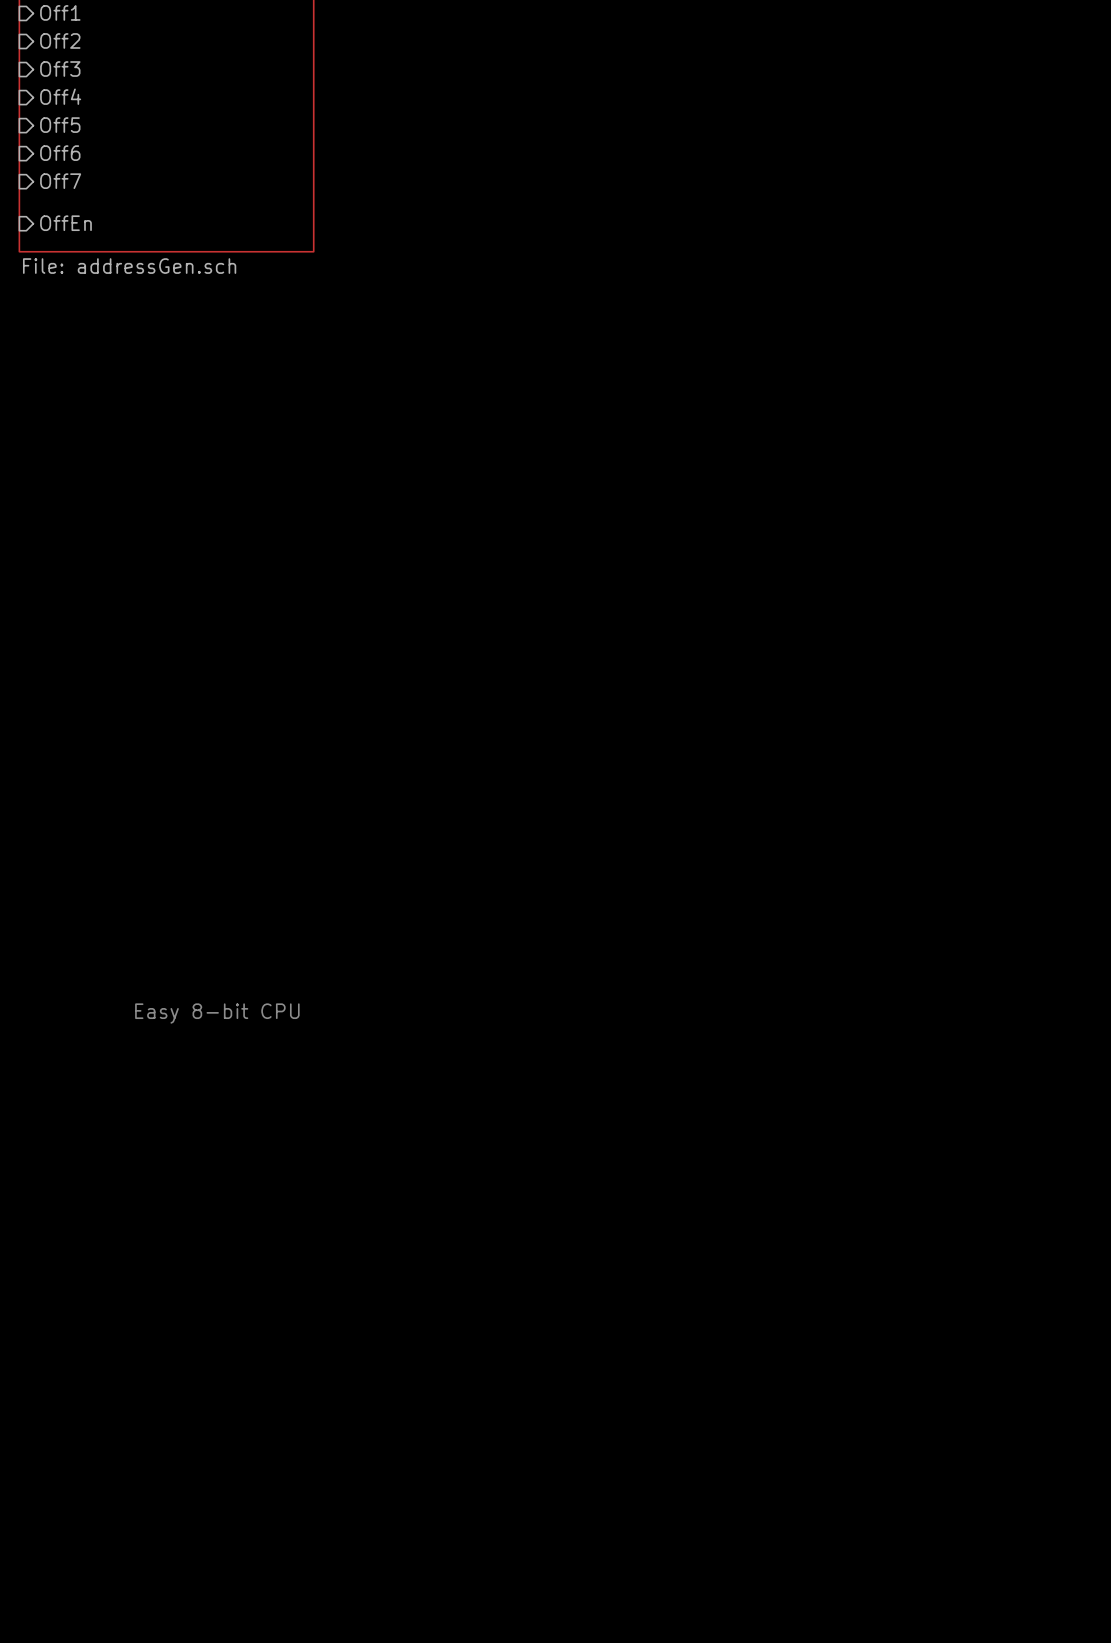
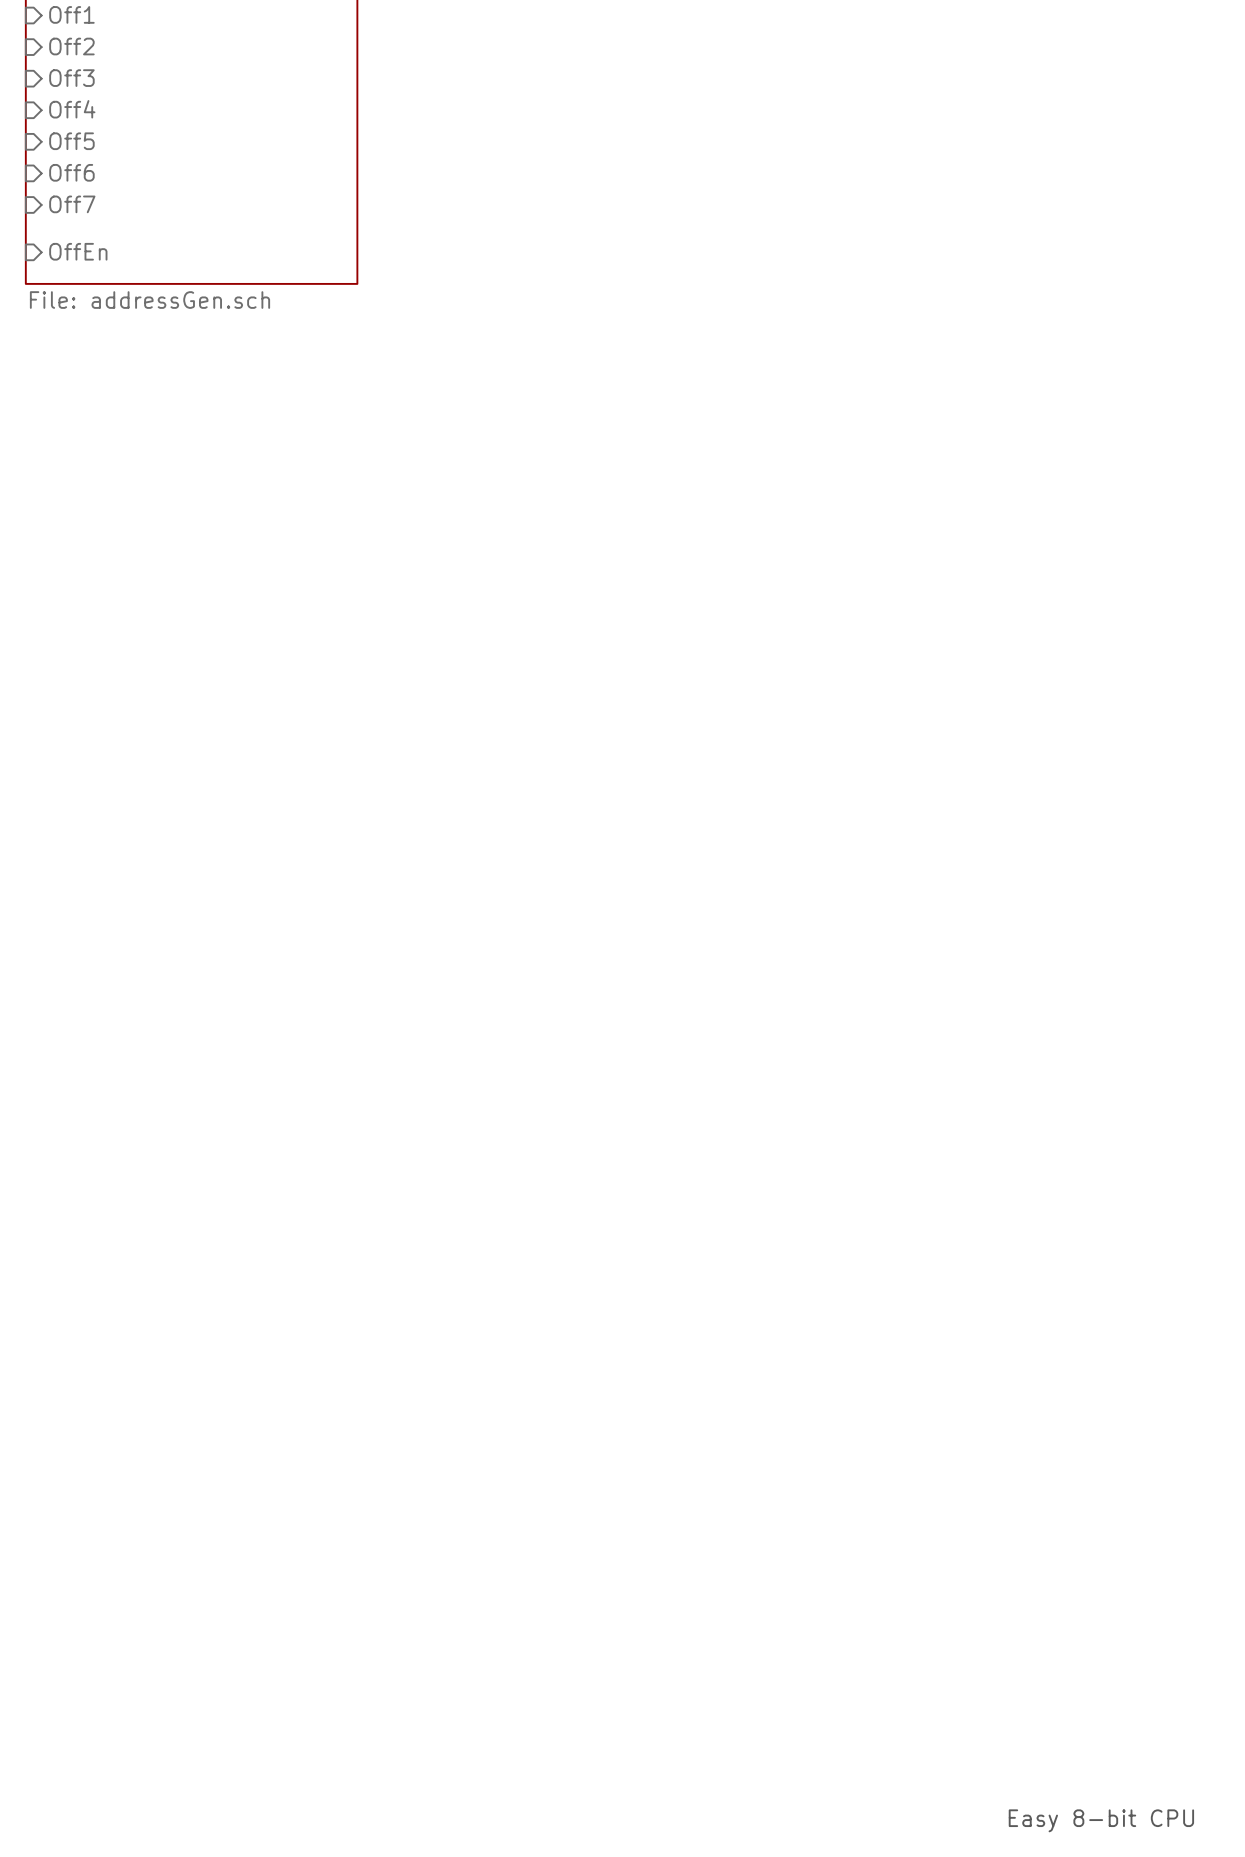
text: Easy 8-bit CPU (217, 1013) -> none
text: none -> Easy 8-bit CPU (1101, 1820)

